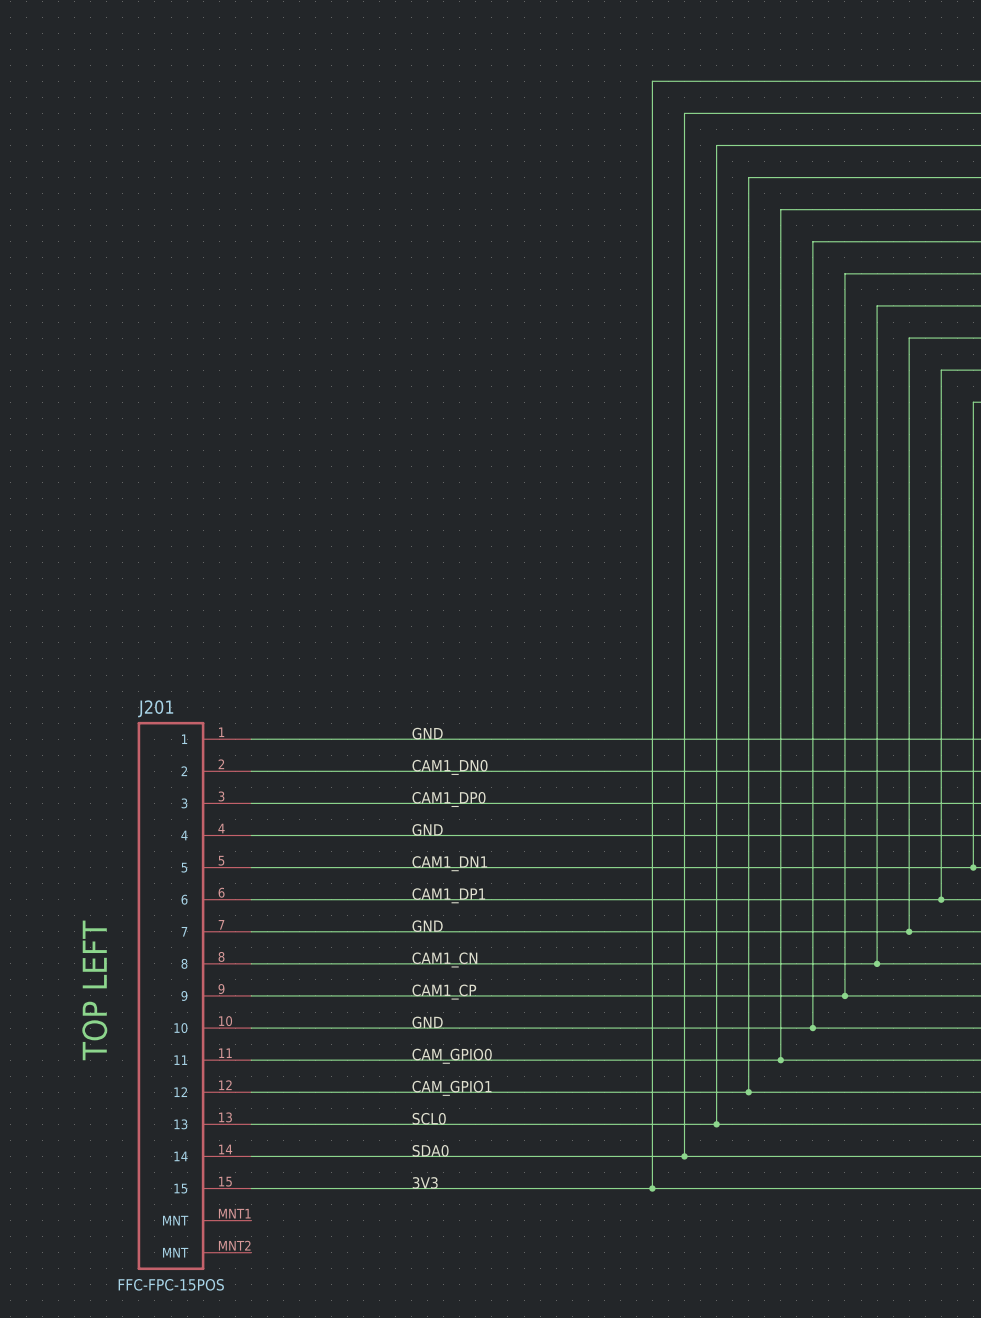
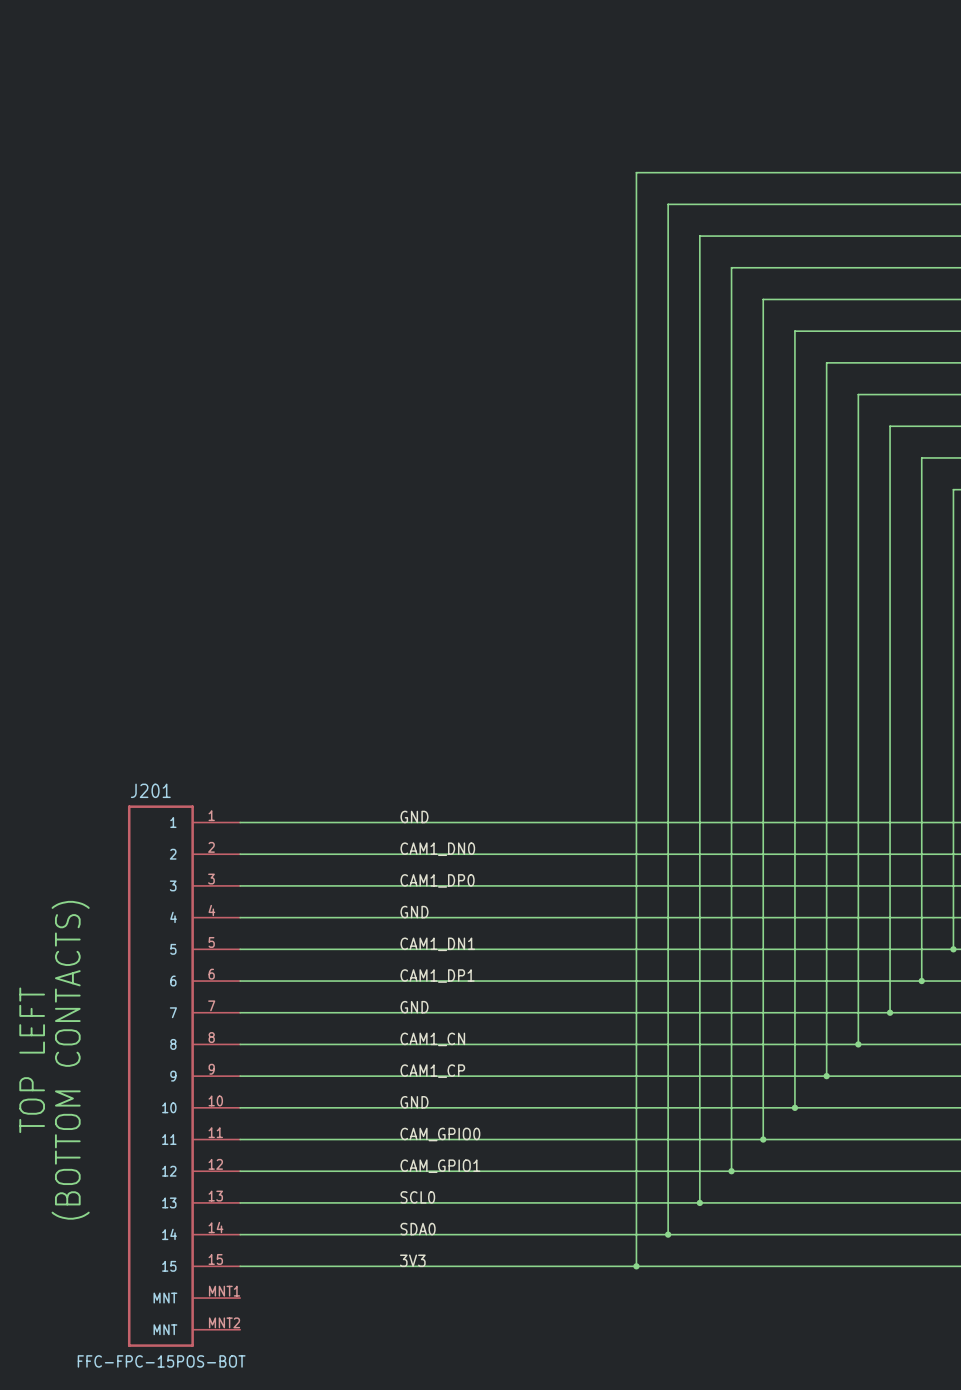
text: none -> (BOTTOM CONTACTS) (70, 1060)
text position: TOP LEFT (94, 990) -> TOP LEFT (32, 1060)
J201 value: FFC-FPC-15POS (171, 1284) -> FFC-FPC-15POS-BOT (161, 1361)

